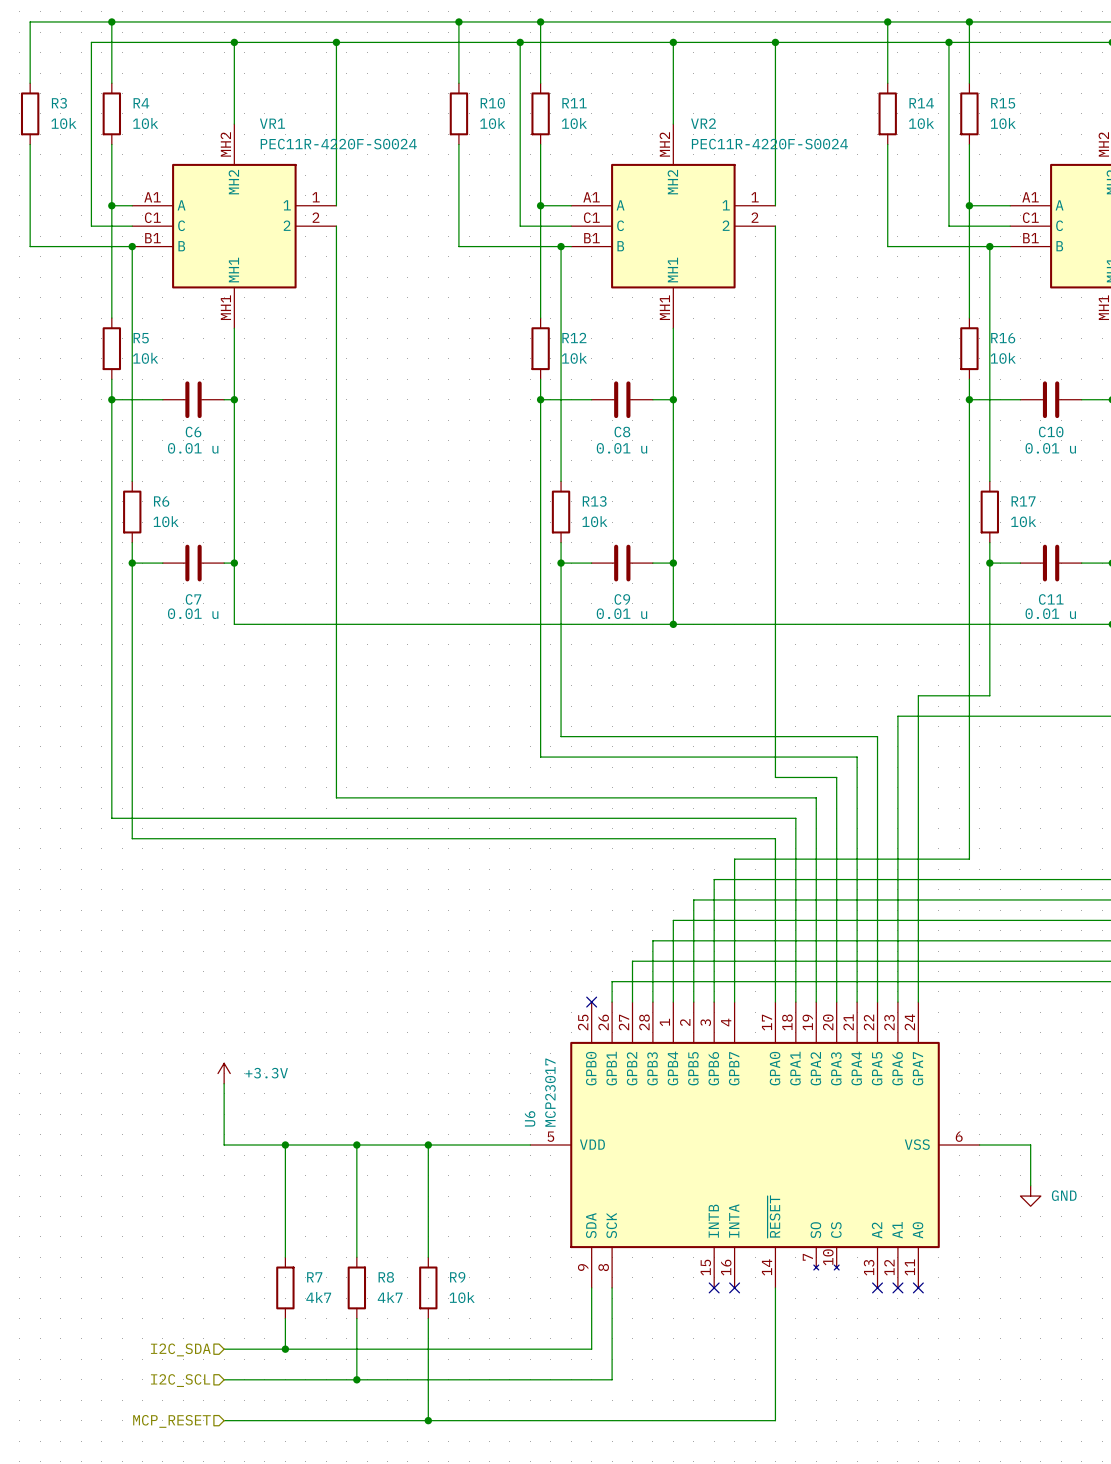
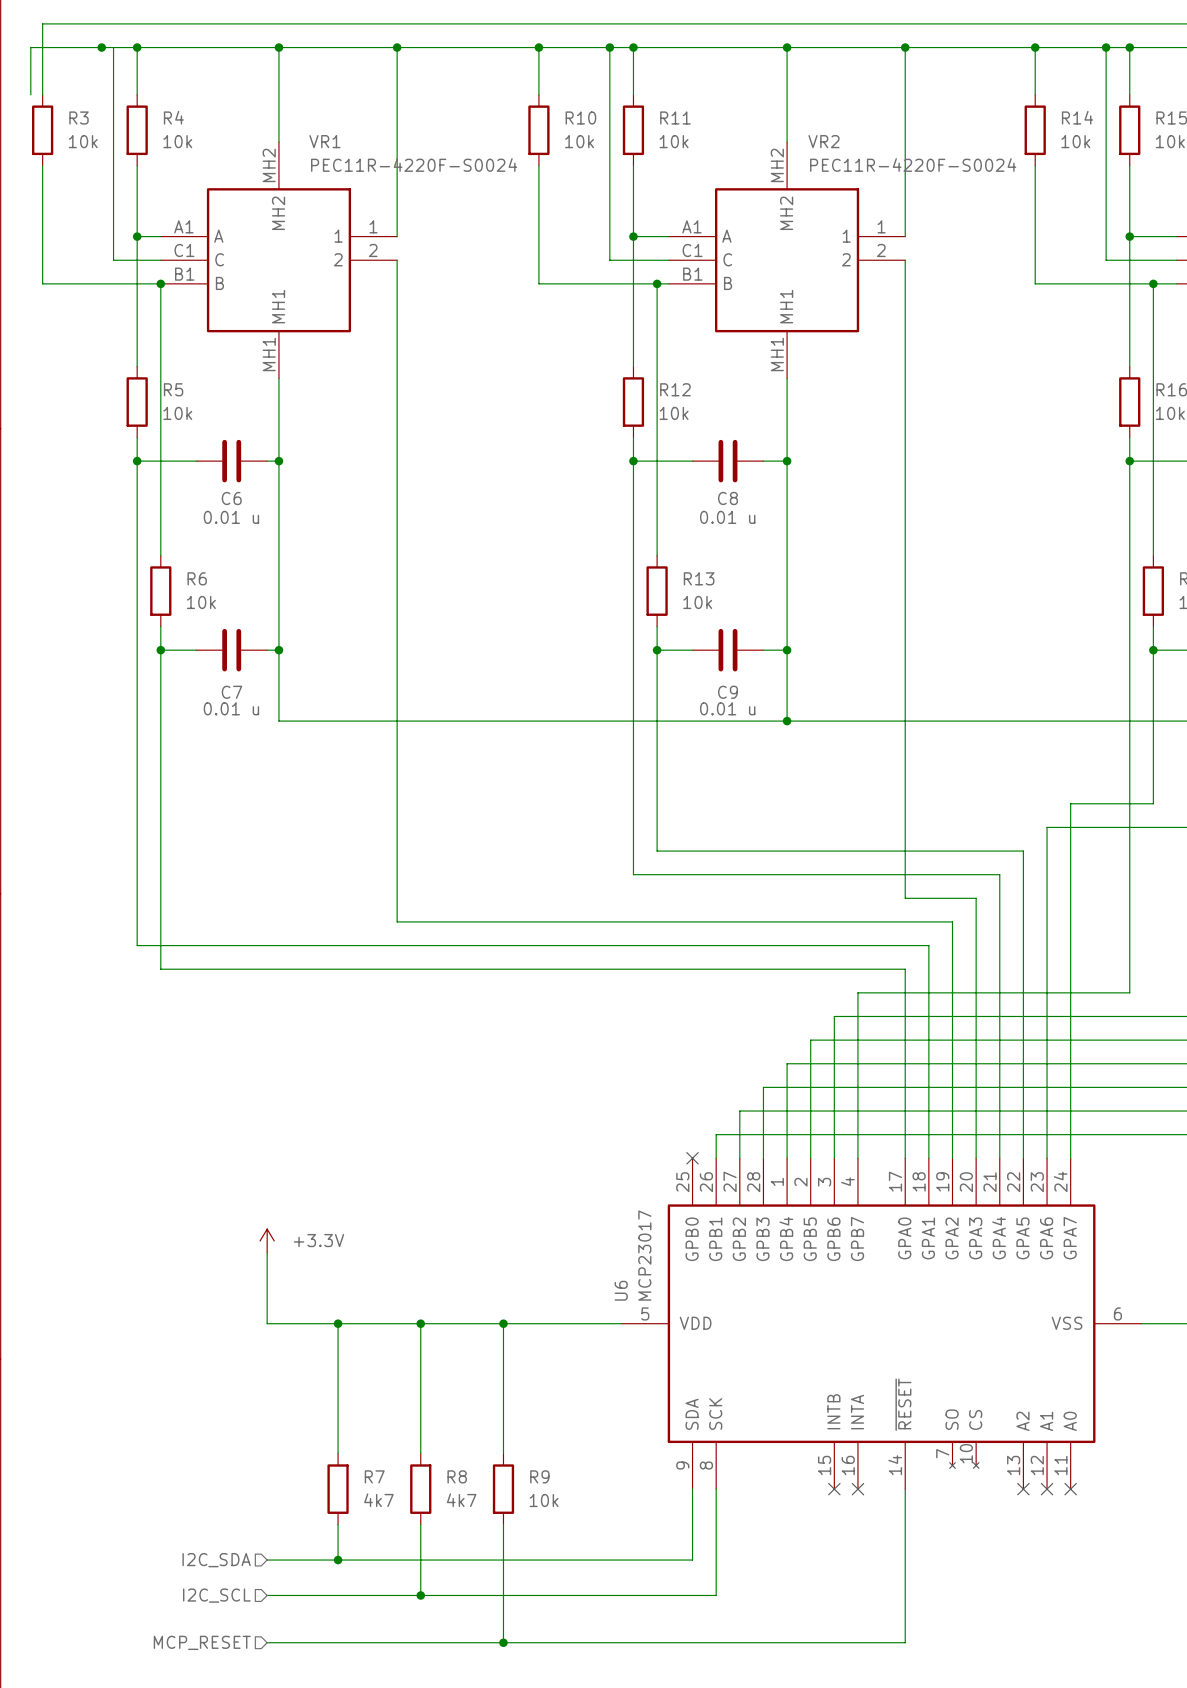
wire: (111, 21) (111, 42) -> none
junction: (111, 21) -> none
wire: (458, 21) (458, 42) -> none
junction position: (458, 21) -> (538, 47)
wire: (540, 21) (540, 42) -> none
junction position: (540, 21) -> (633, 47)
wire: (887, 21) (887, 42) -> none
junction position: (887, 21) -> (1035, 47)
wire: (969, 21) (969, 42) -> none
junction position: (969, 21) -> (1129, 47)
junction: none -> (101, 47)
wire: none -> (113, 47) (30, 47) (30, 94)
junction: none -> (137, 47)

